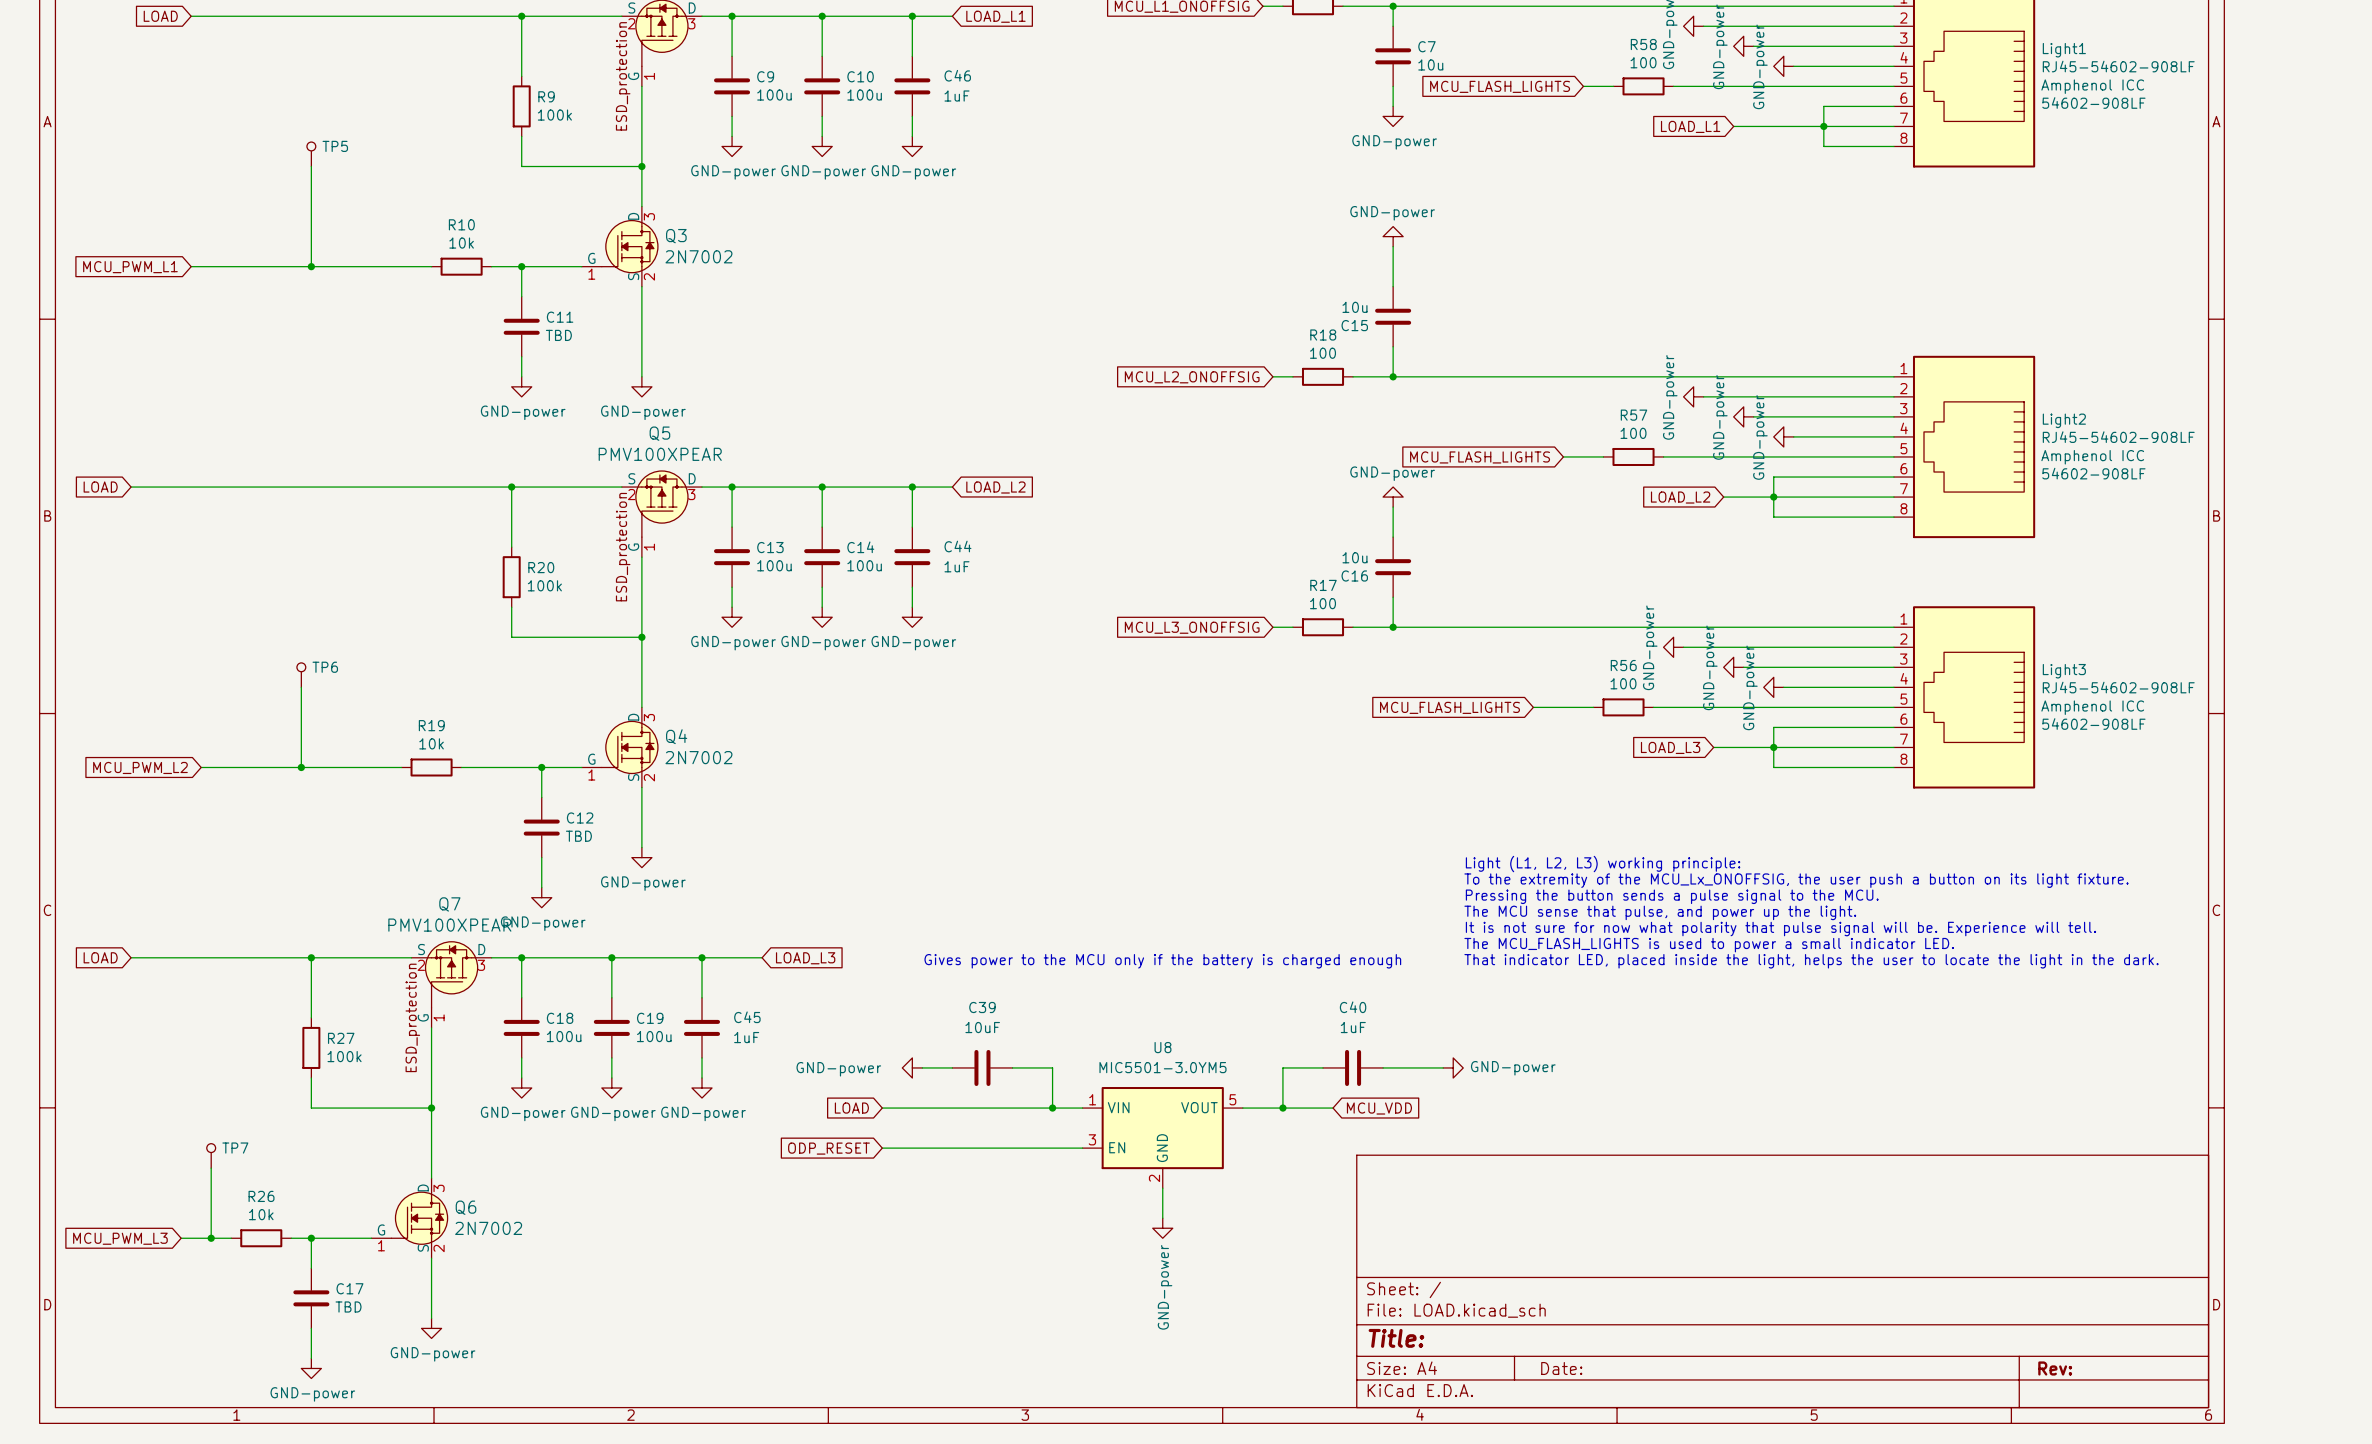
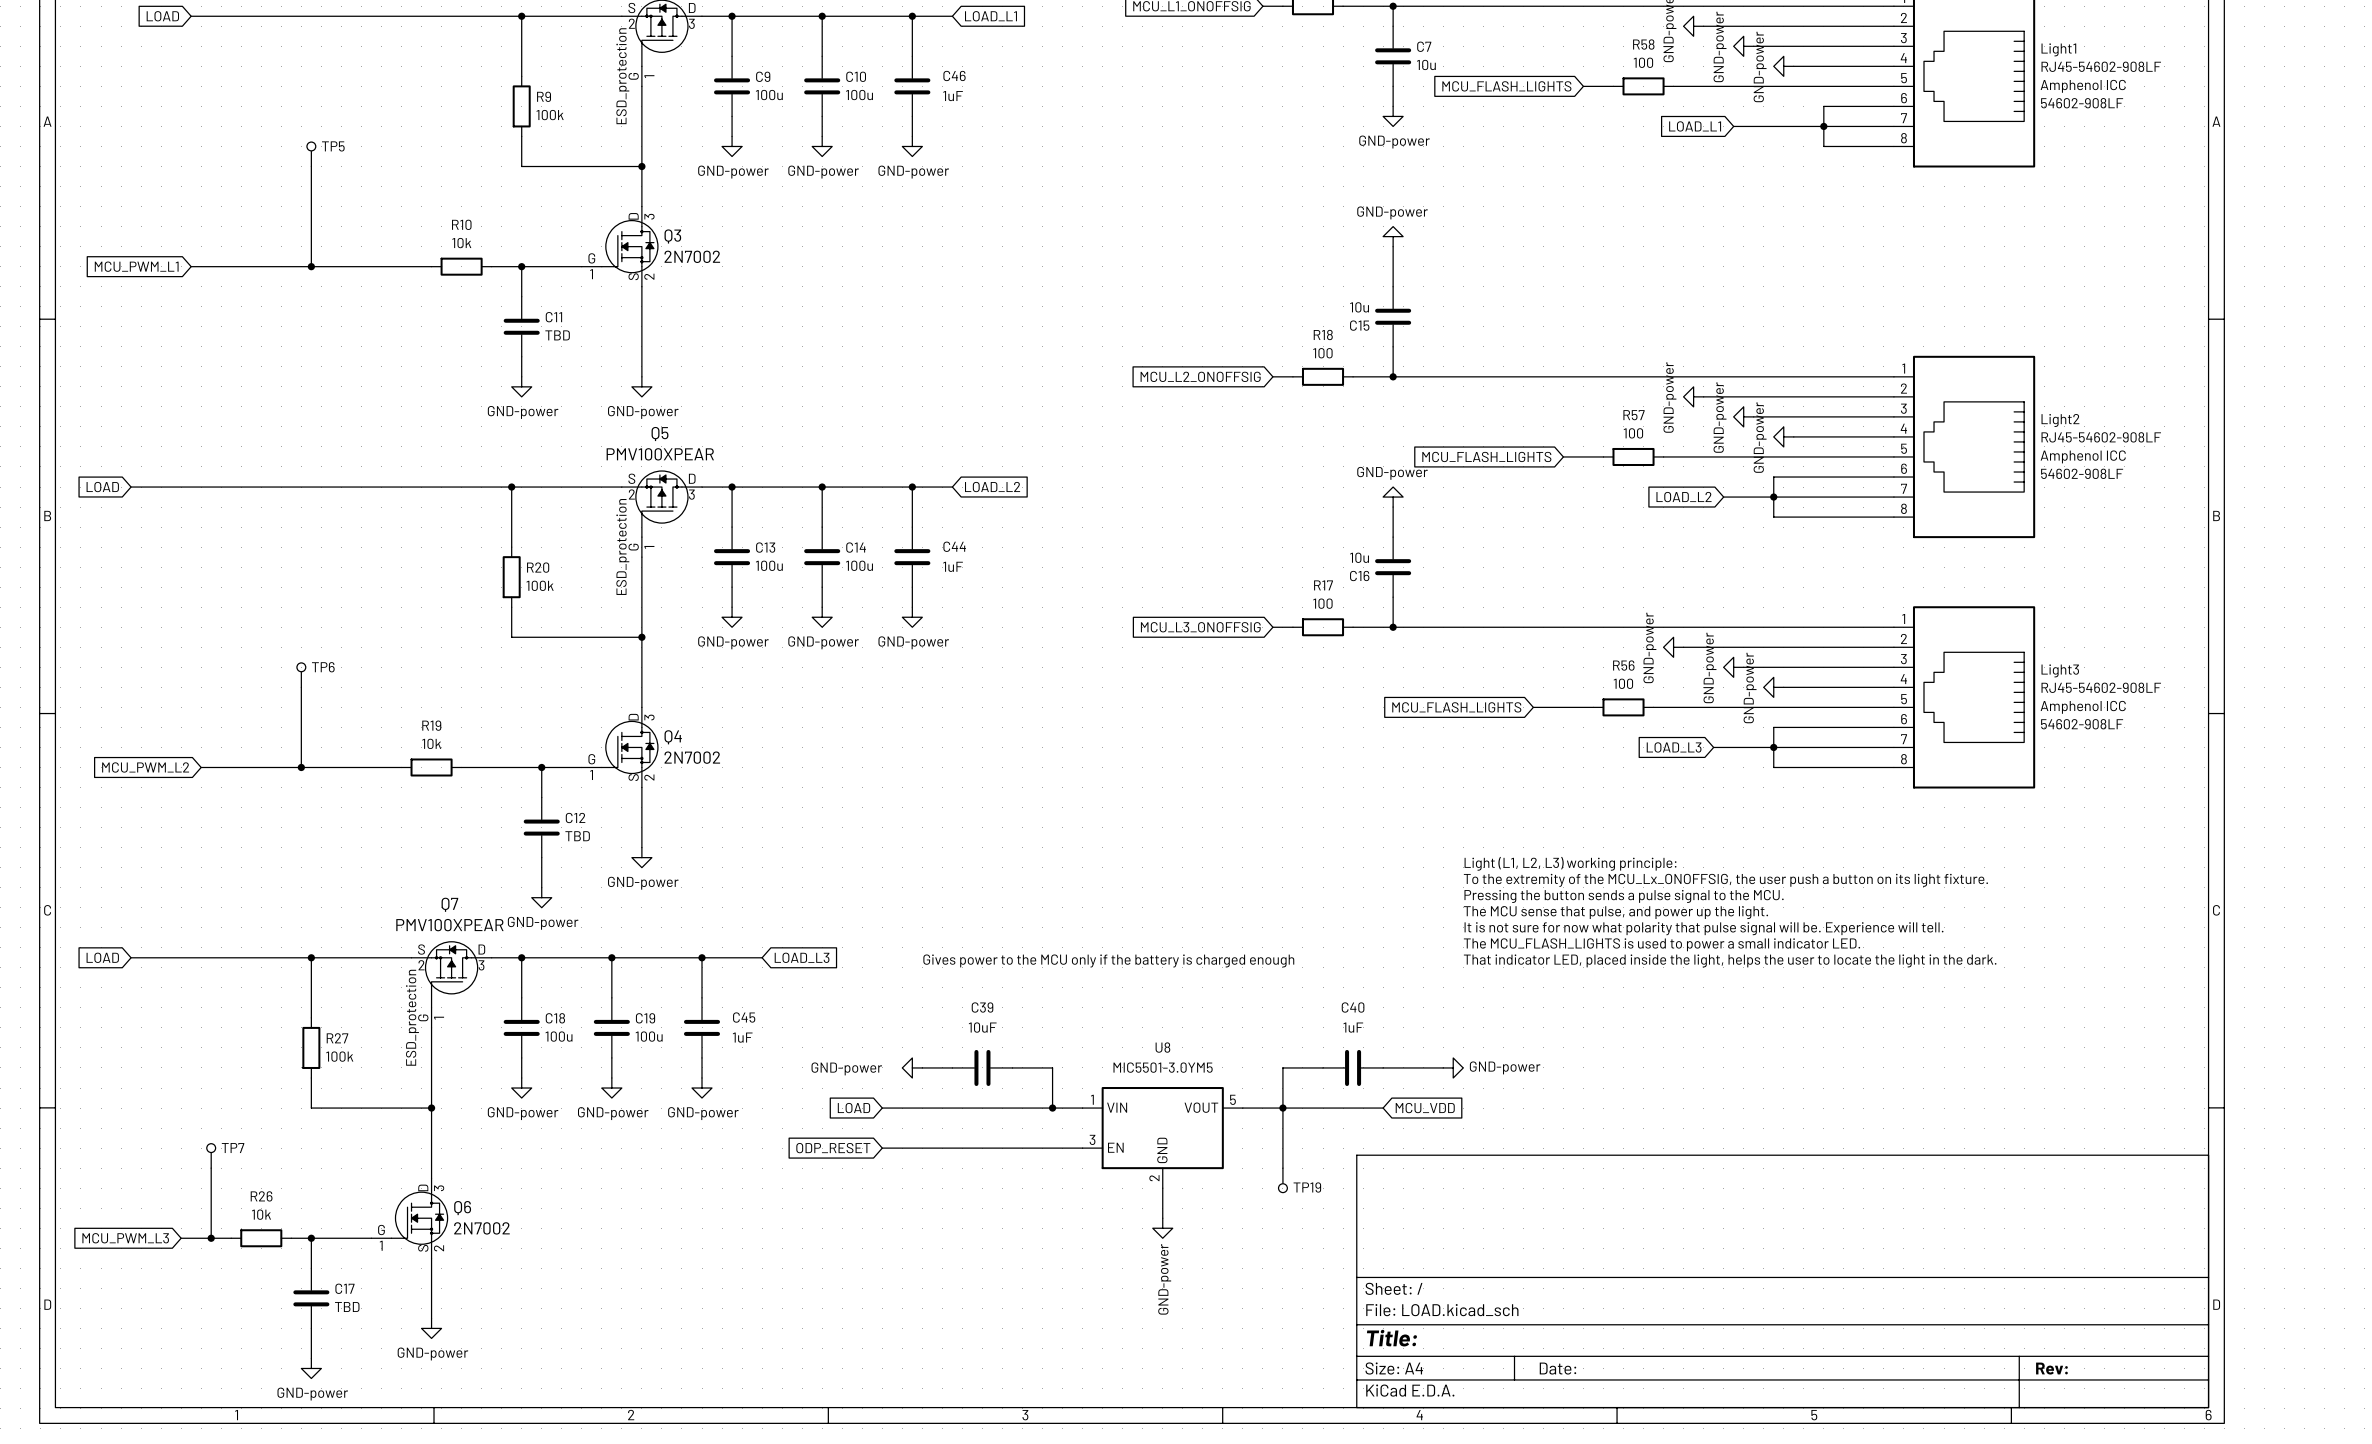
wire: none -> (1282, 1108) (1282, 1168)
wire: none -> (1333, 1108) (1383, 1108)
global label position: MCU_VDD (1379, 1108) -> MCU_VDD (1425, 1108)
TP19: none -> (1282, 1180)

